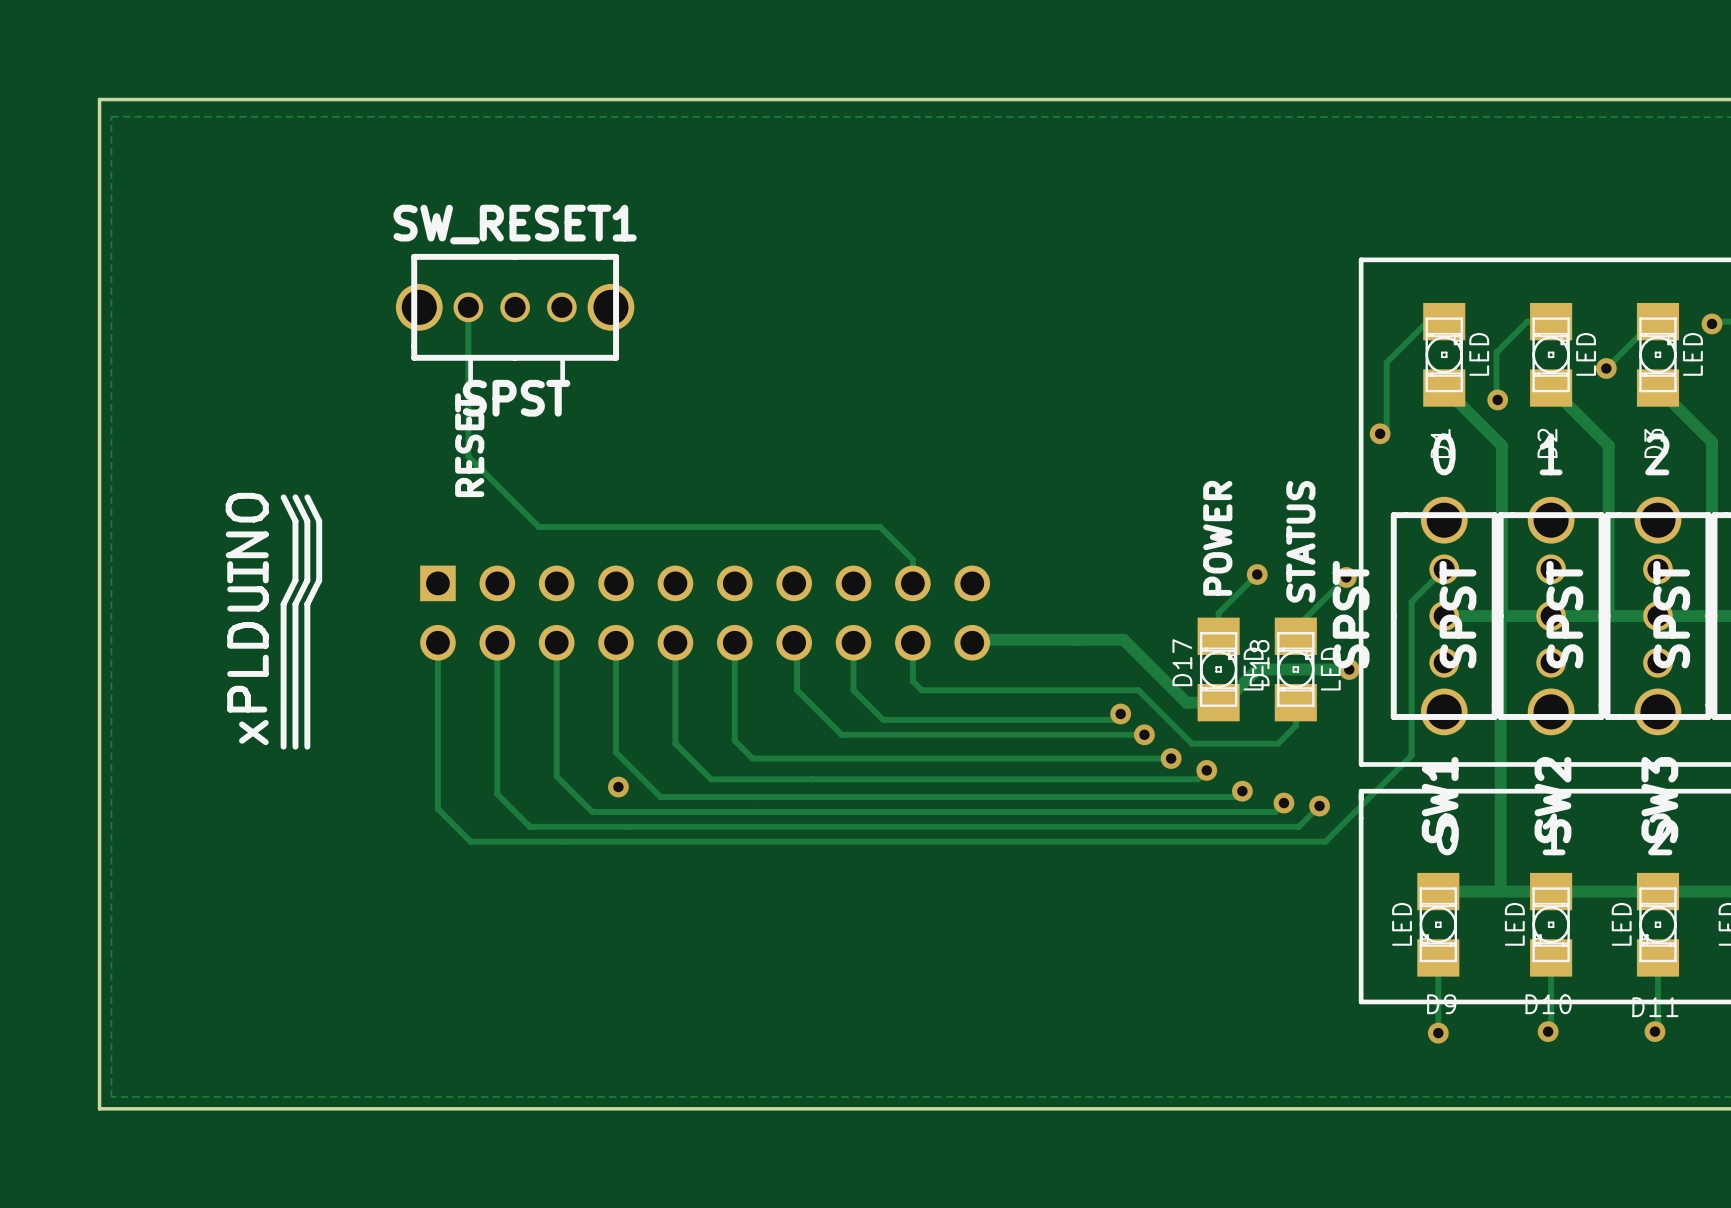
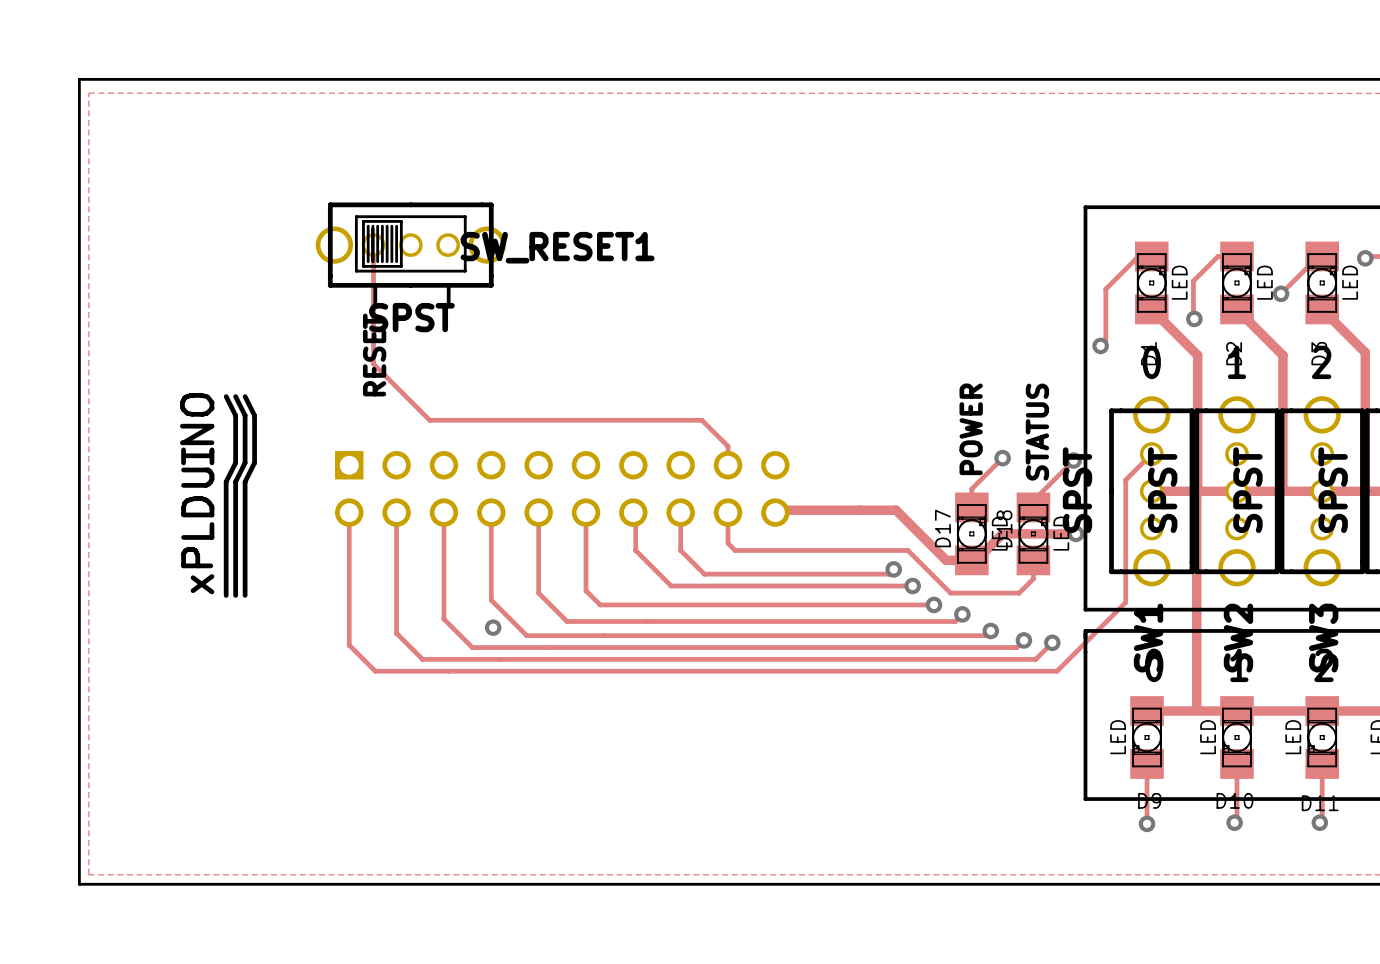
SW_RESET1 name position: SW_RESET1 (515, 224) -> SW_RESET1 (557, 247)
SW_RESET1 footprint: [395, 253, 635, 361] -> [315, 202, 506, 288]

